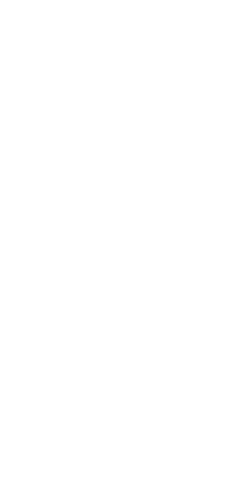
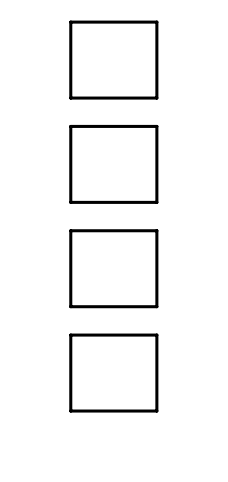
part: none -> (113, 60)
part: none -> (113, 164)
part: none -> (113, 268)
part: none -> (113, 373)

